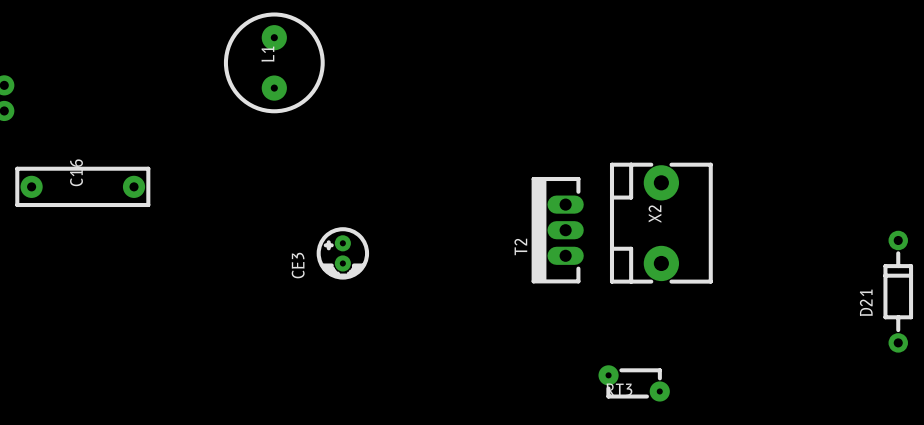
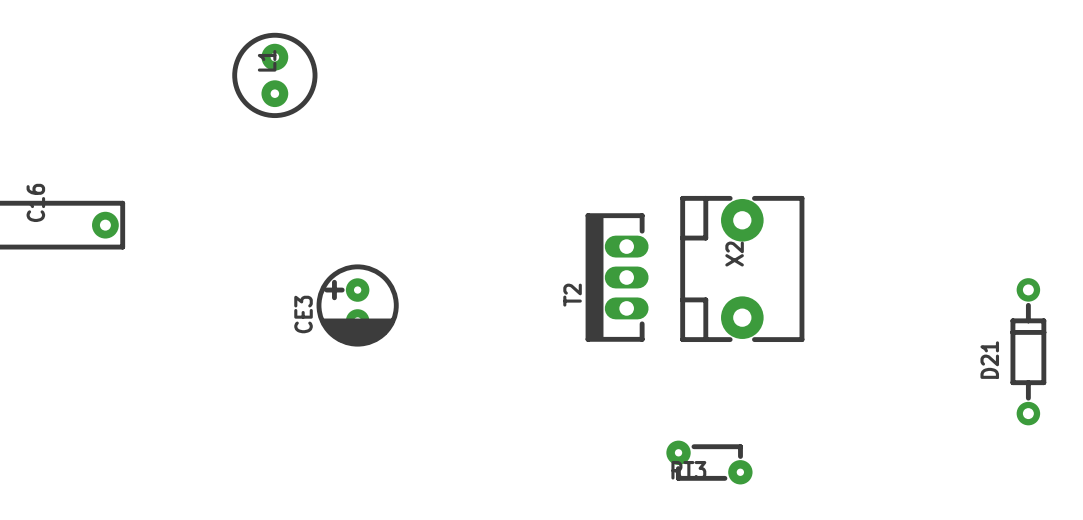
L1 footprint: [223, 12, 325, 114] -> [232, 32, 318, 119]
CE3 footprint: [316, 227, 370, 280] -> [316, 264, 399, 347]

